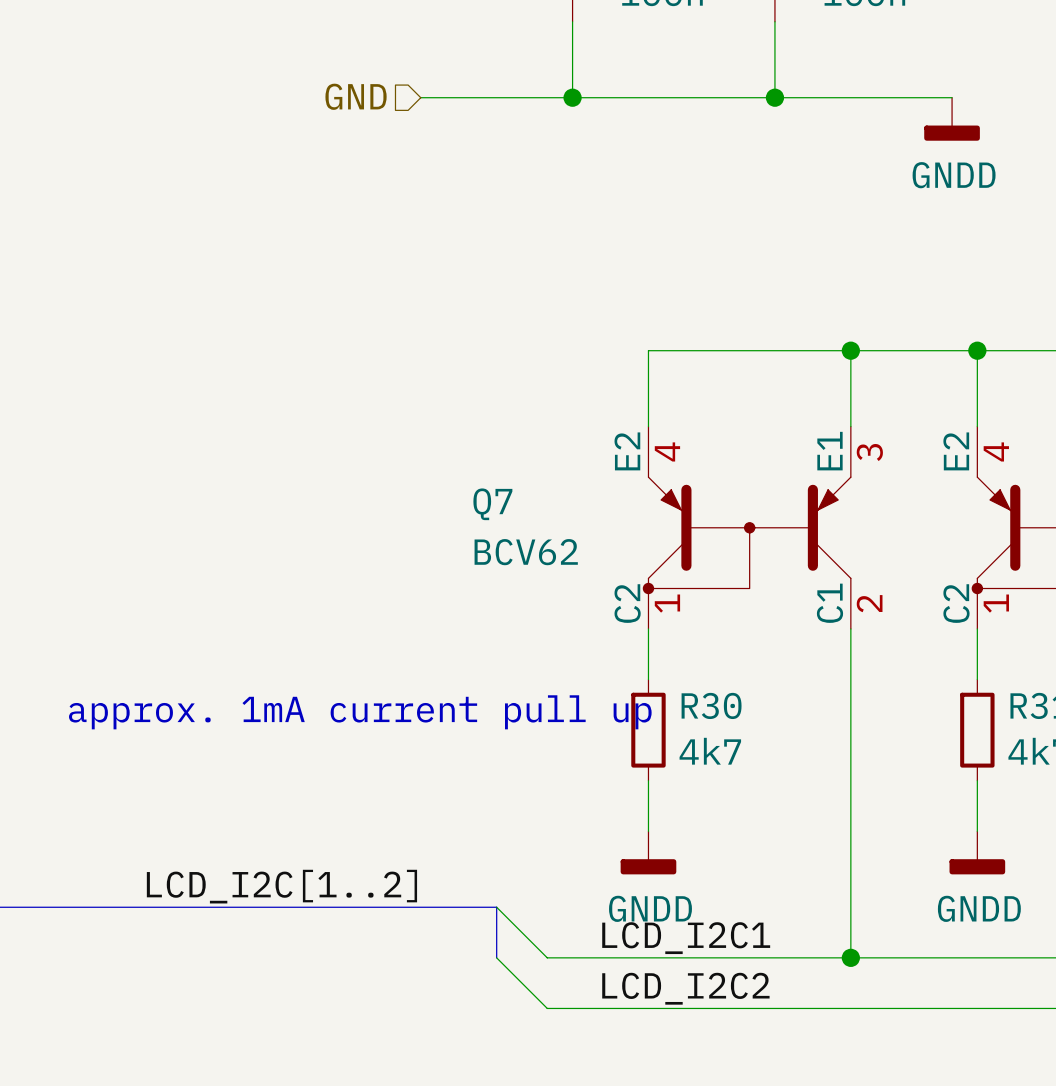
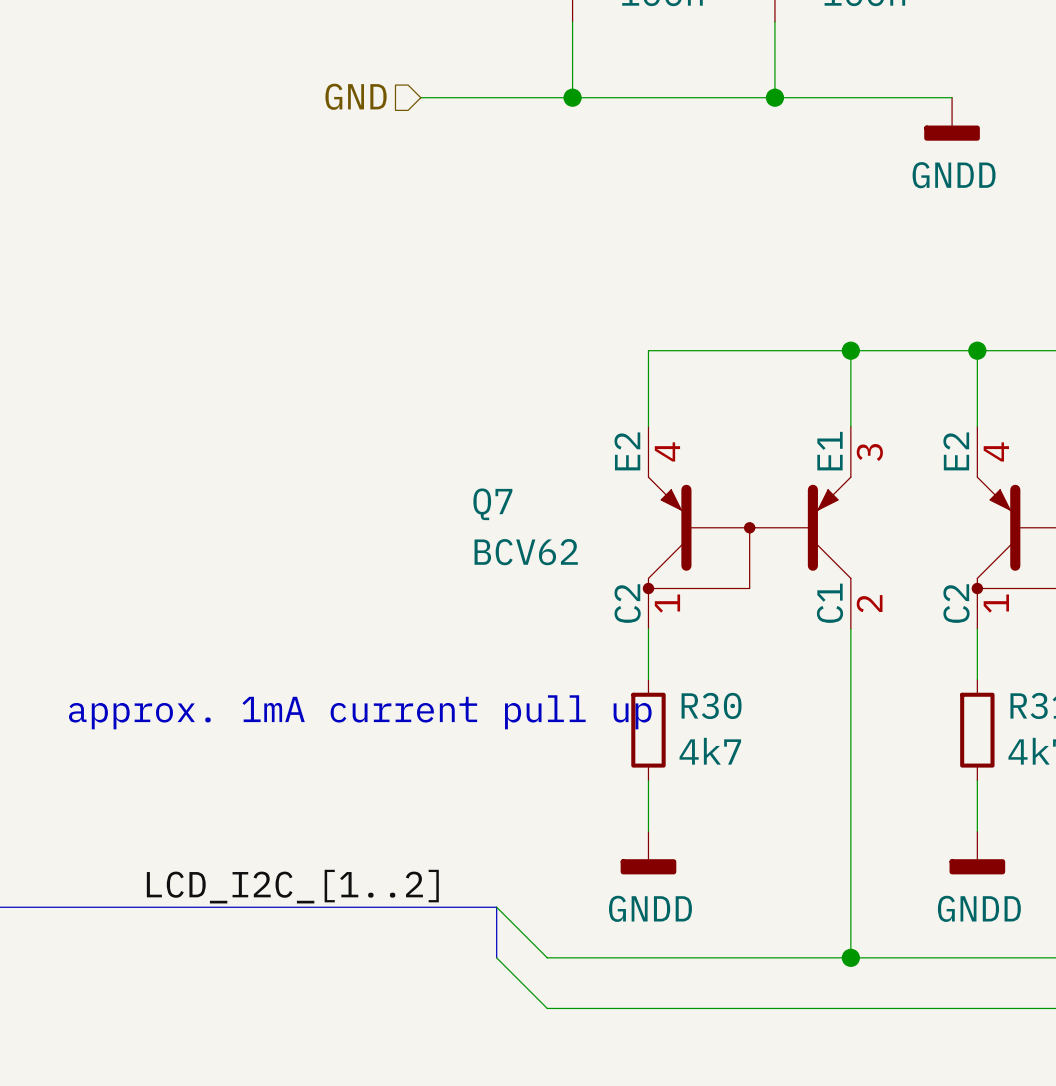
label: LCD_I2C[1..2] (281, 886) -> LCD_I2C_[1..2] (292, 886)
label: LCD_I2C1 (686, 938) -> none
label: LCD_I2C2 (685, 988) -> none

